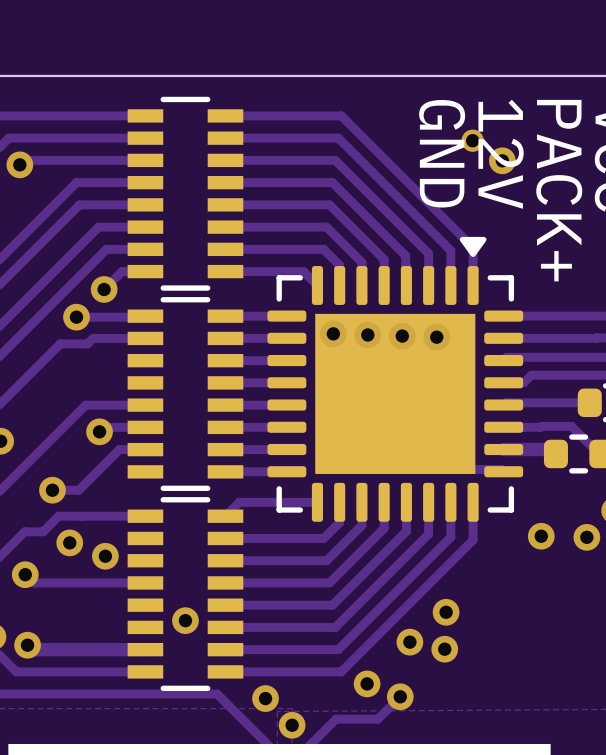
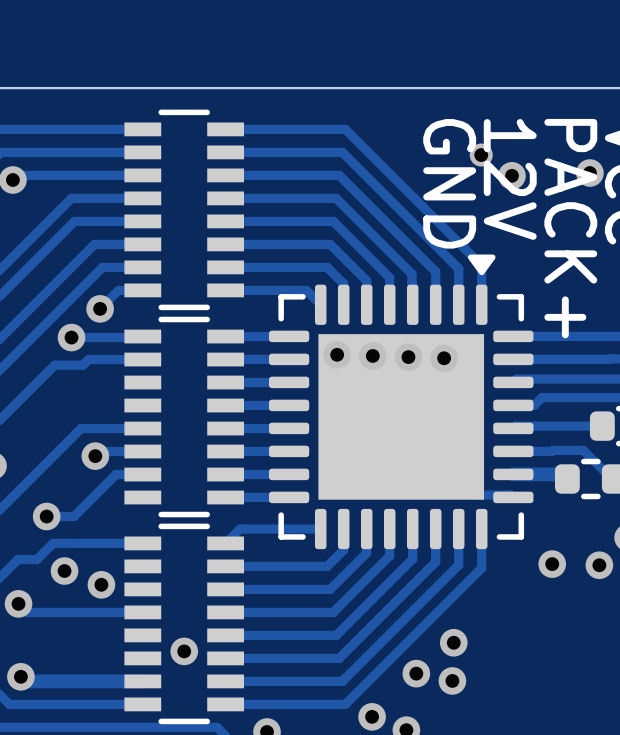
via: none -> (589, 173)

